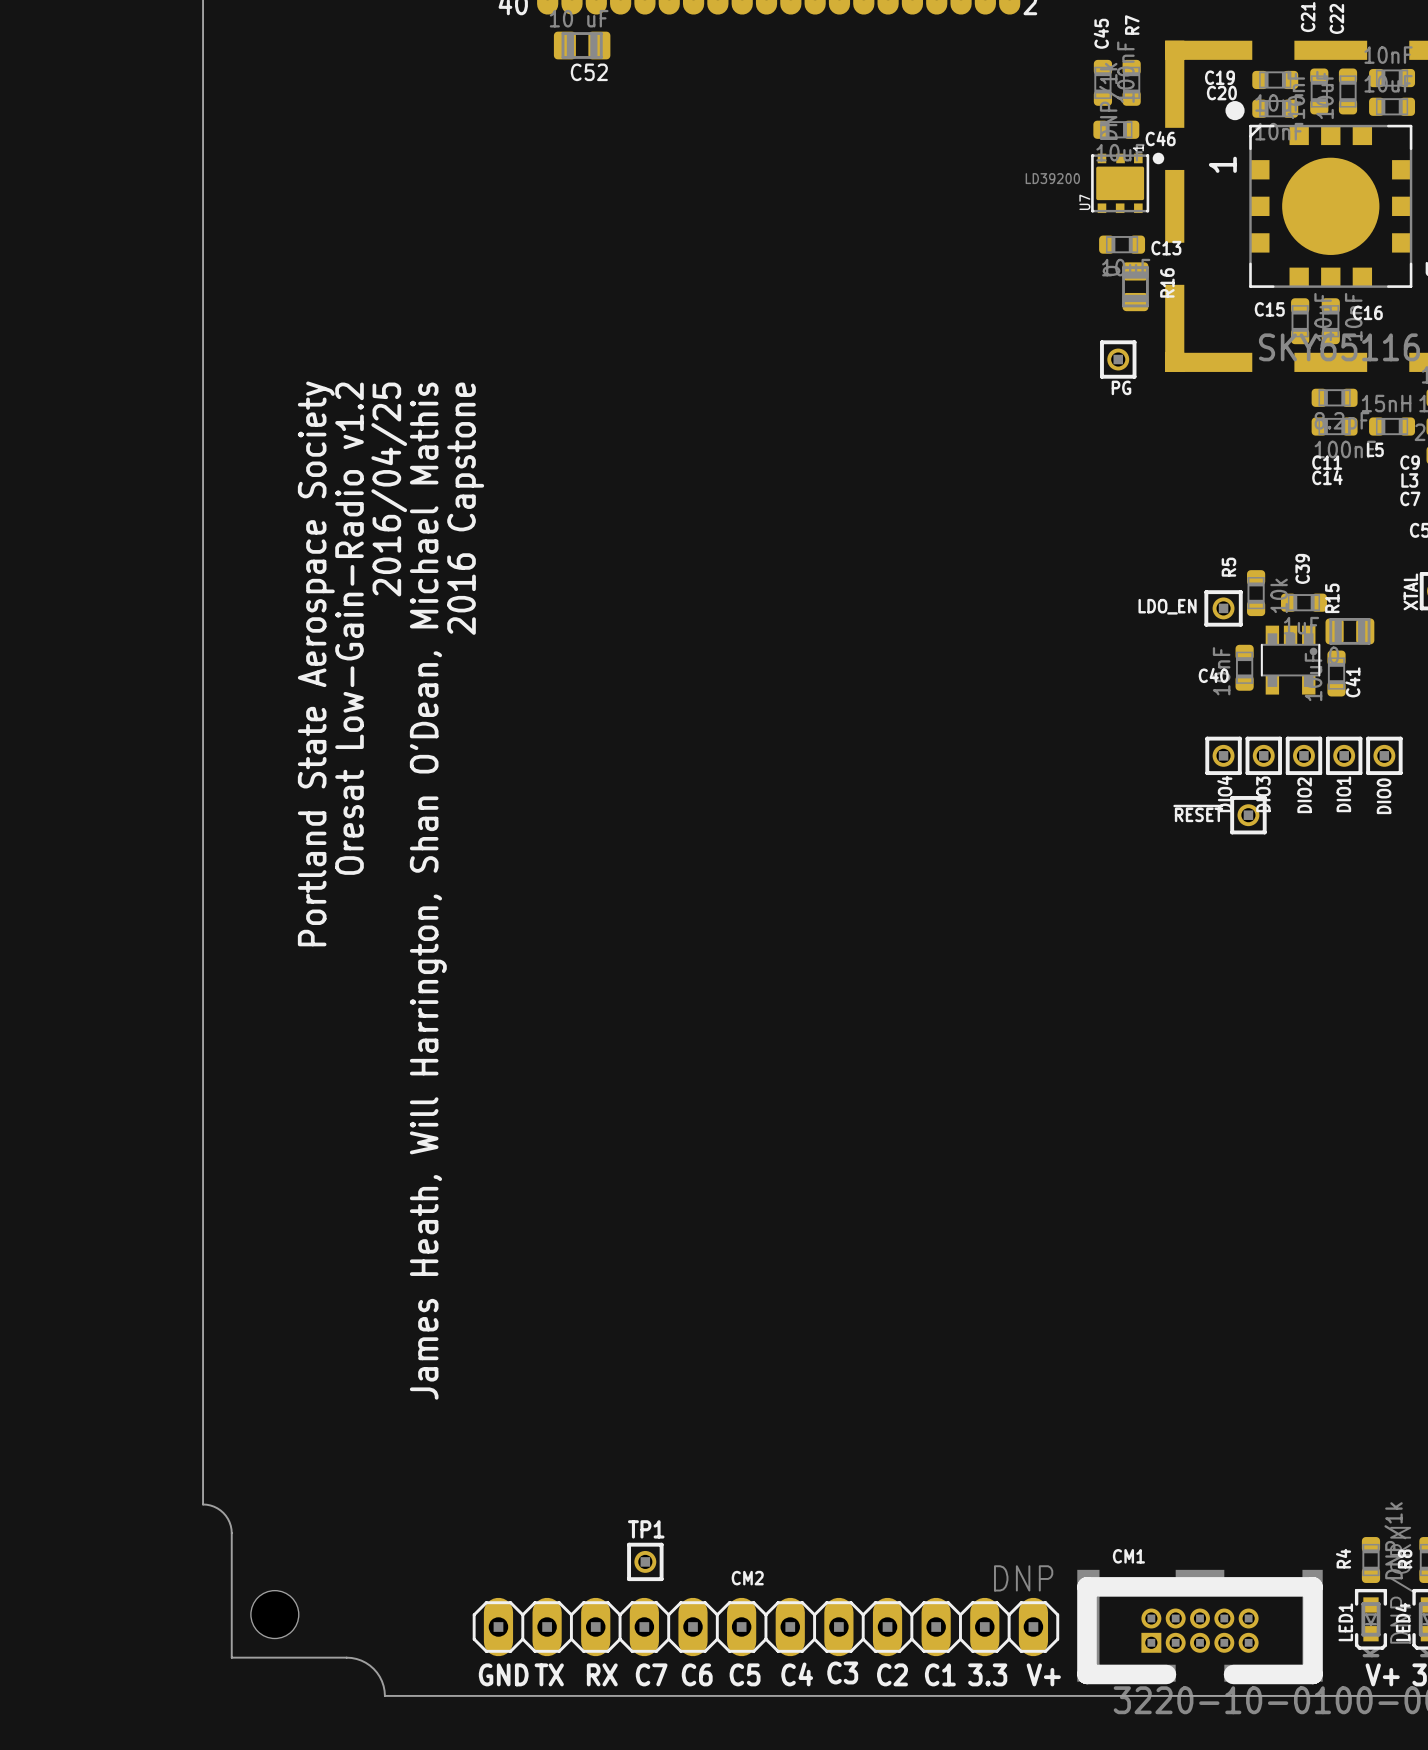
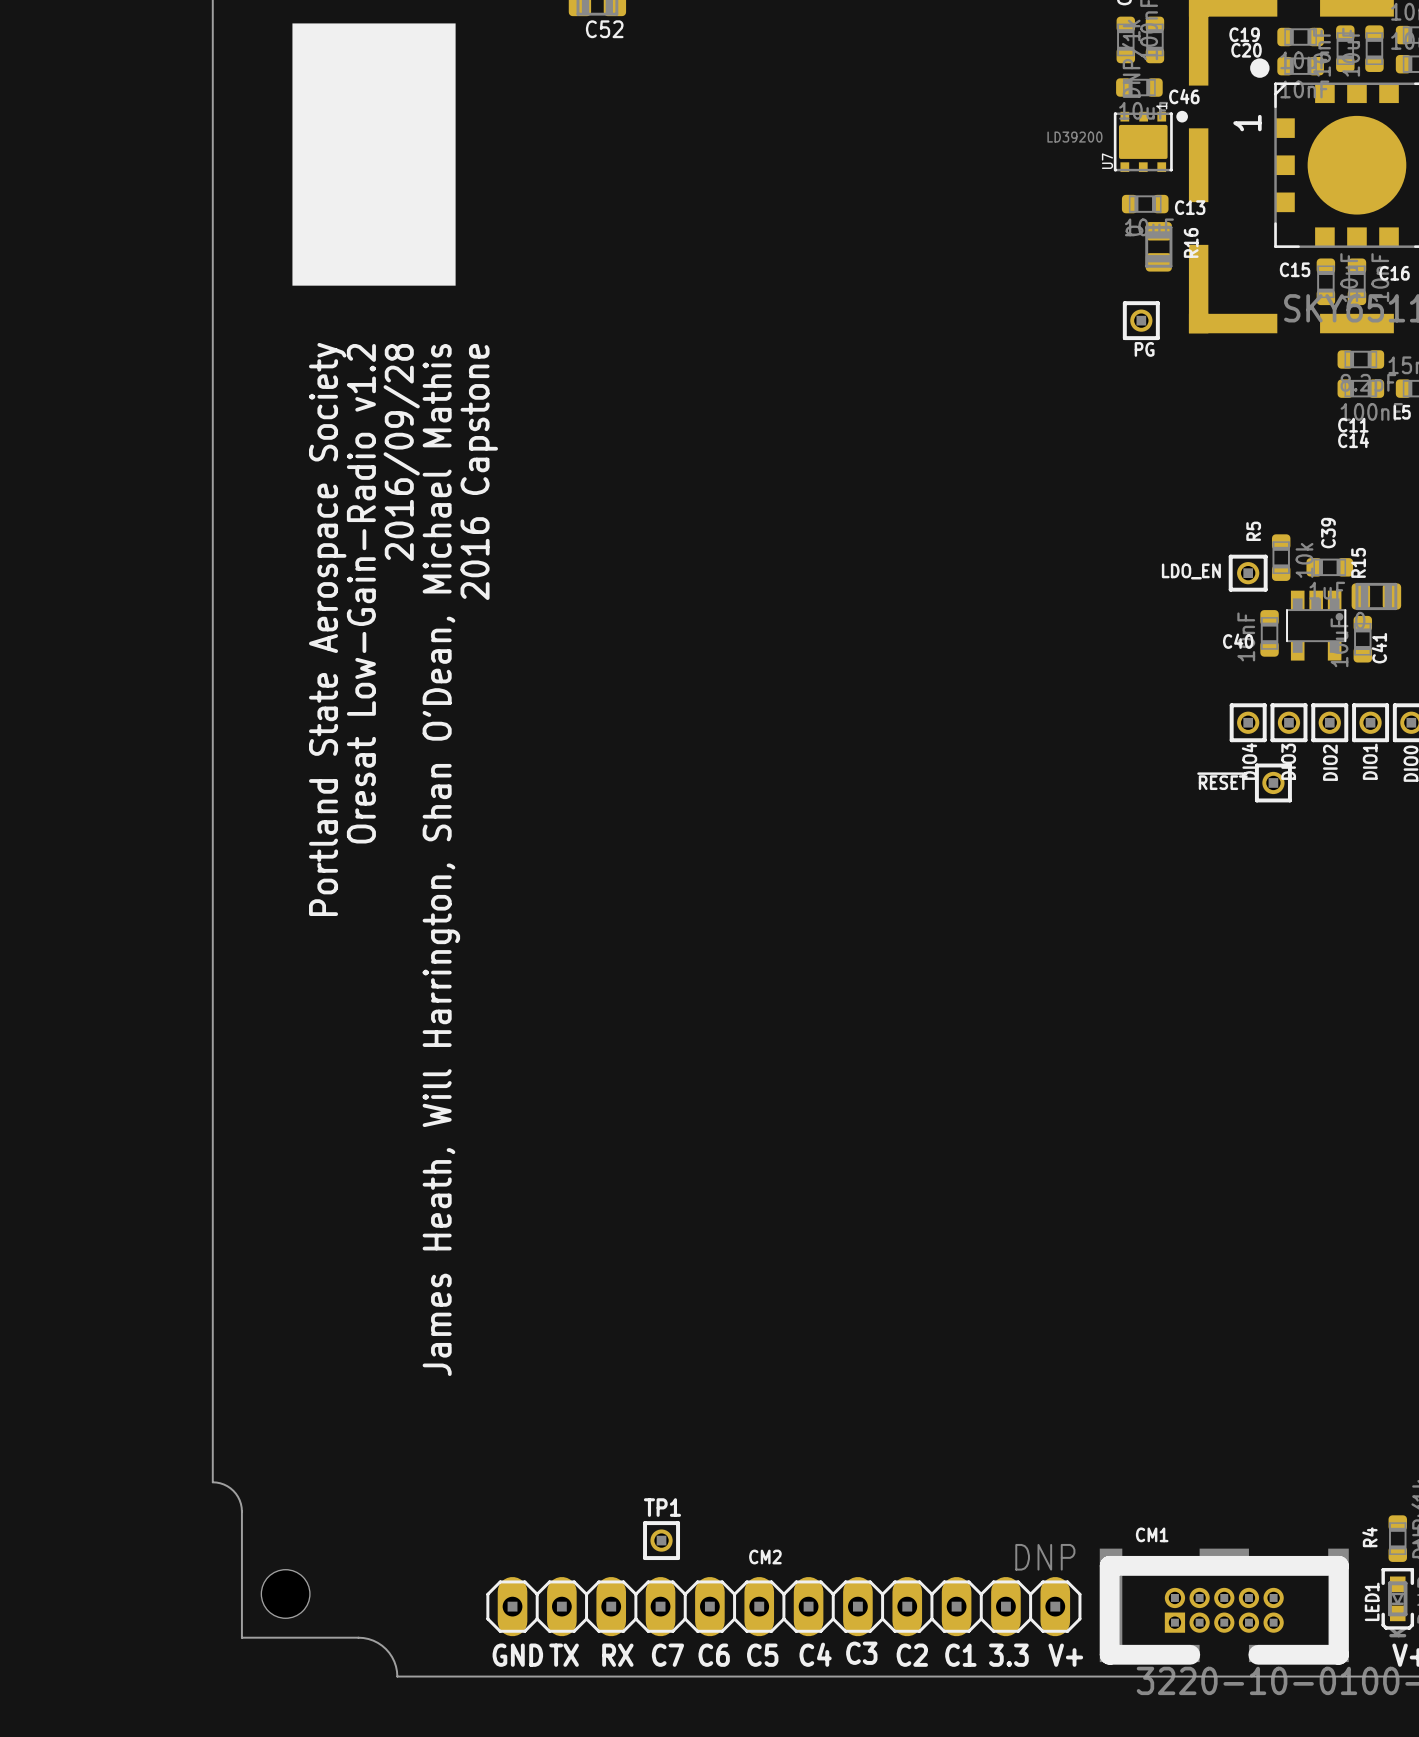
drawing: none -> [292, 23, 456, 286]
text: 2016/04/25 (389, 489) -> 2016/09/28 (401, 452)

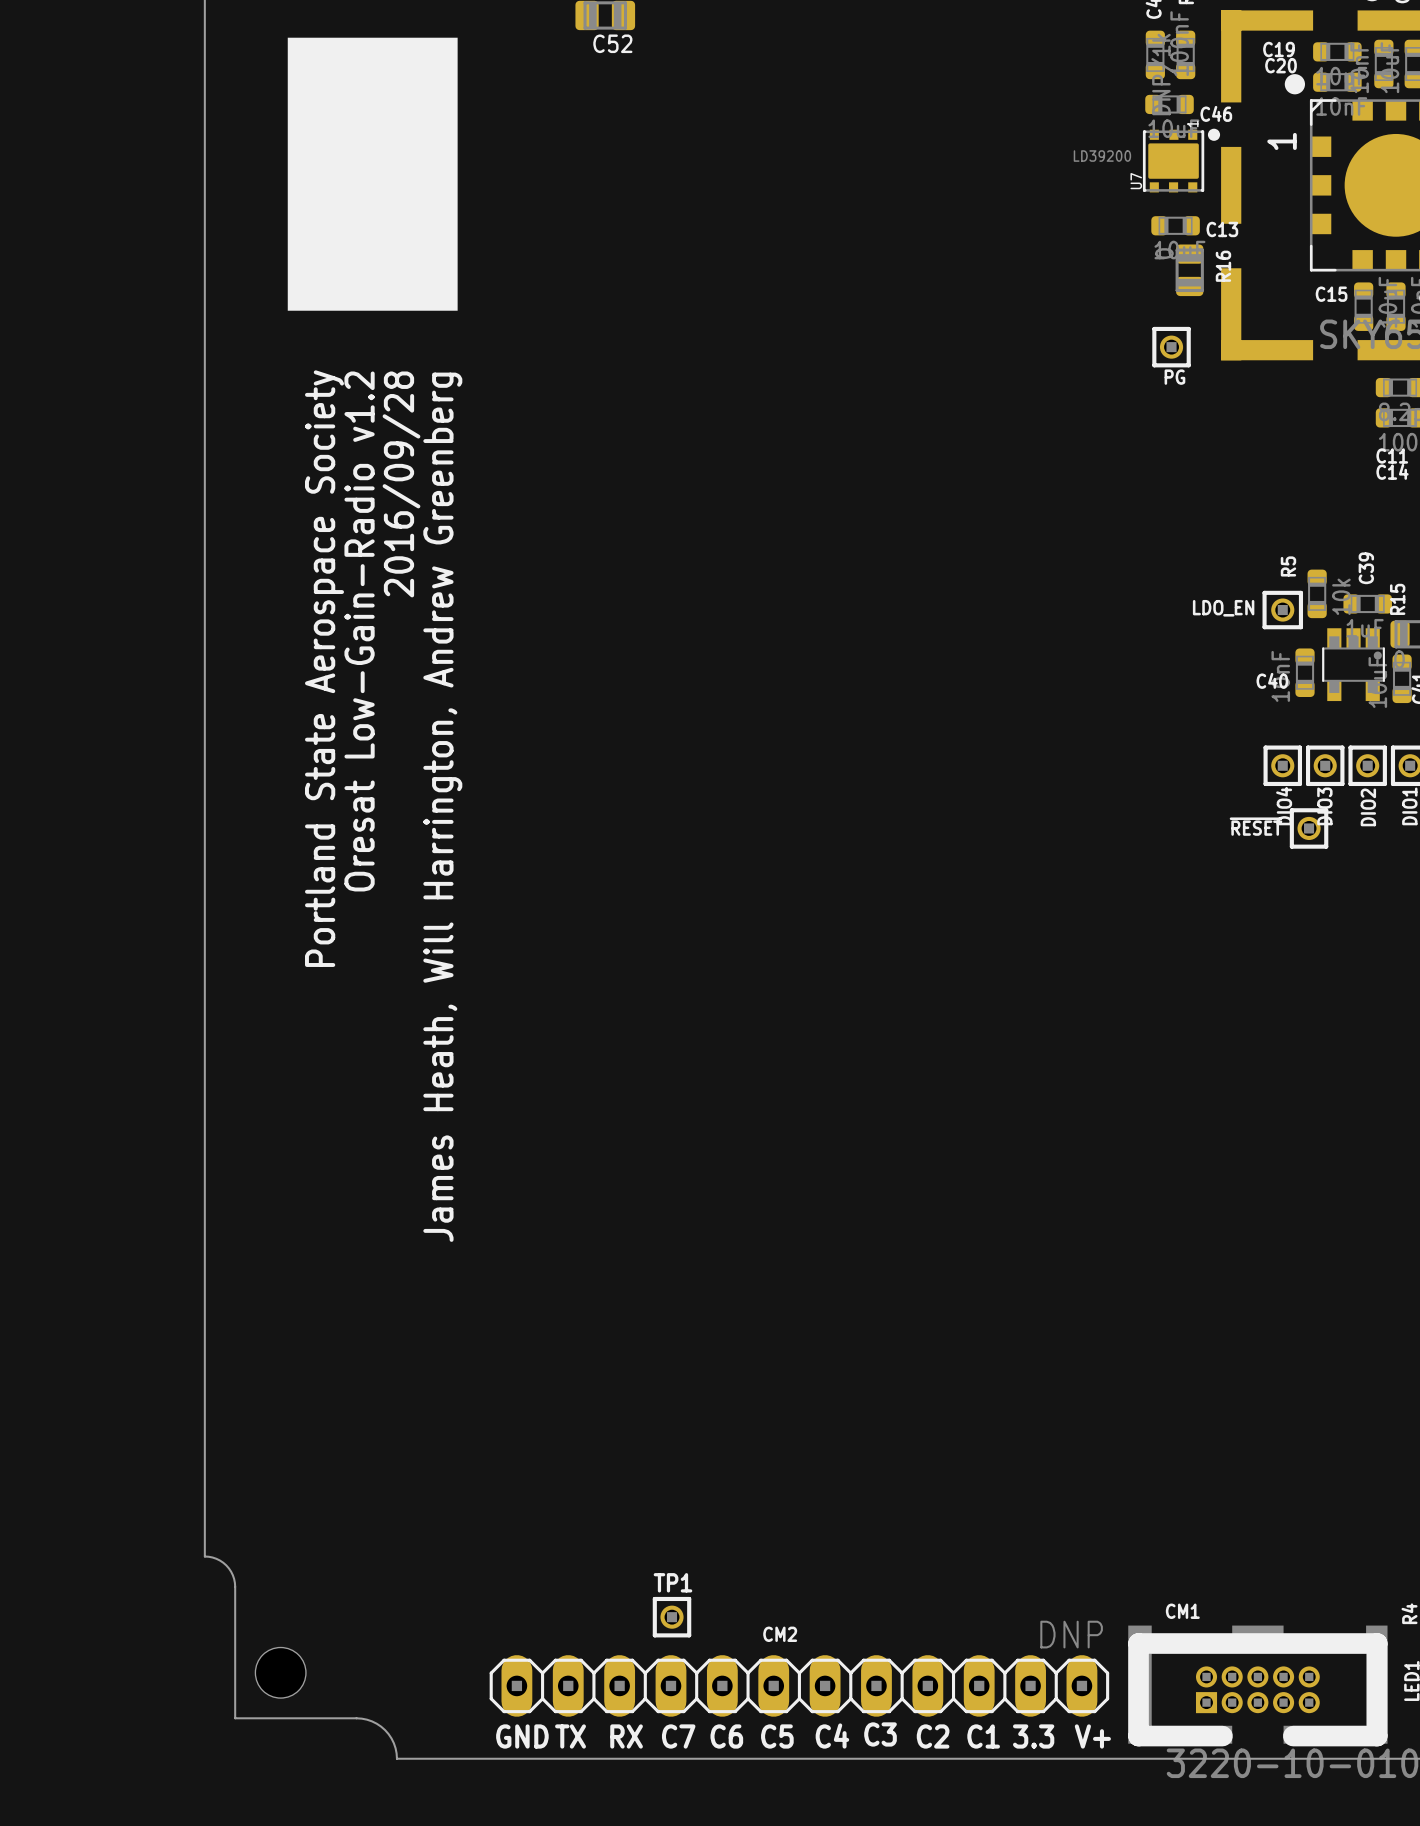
text: 2016 Capstone (479, 471) -> none
text: James Heath, Will Harrington, Shan O'Dean, Michael Mathis (441, 859) -> James Heath, Will Harrington, Andrew Greenberg (442, 807)

